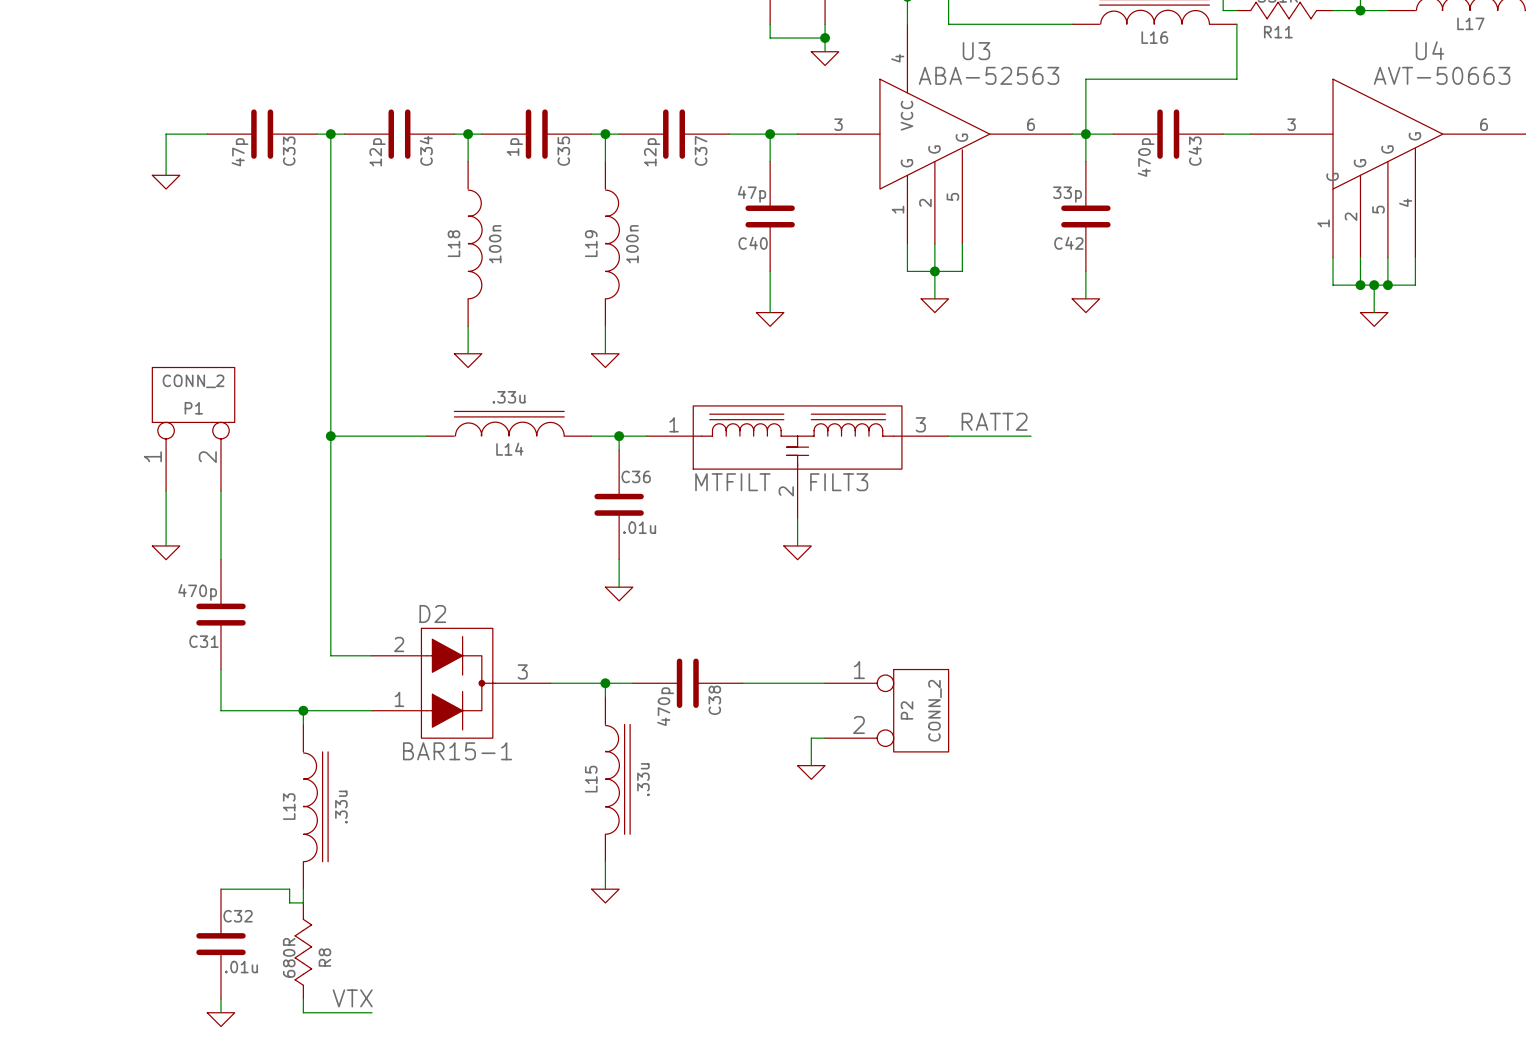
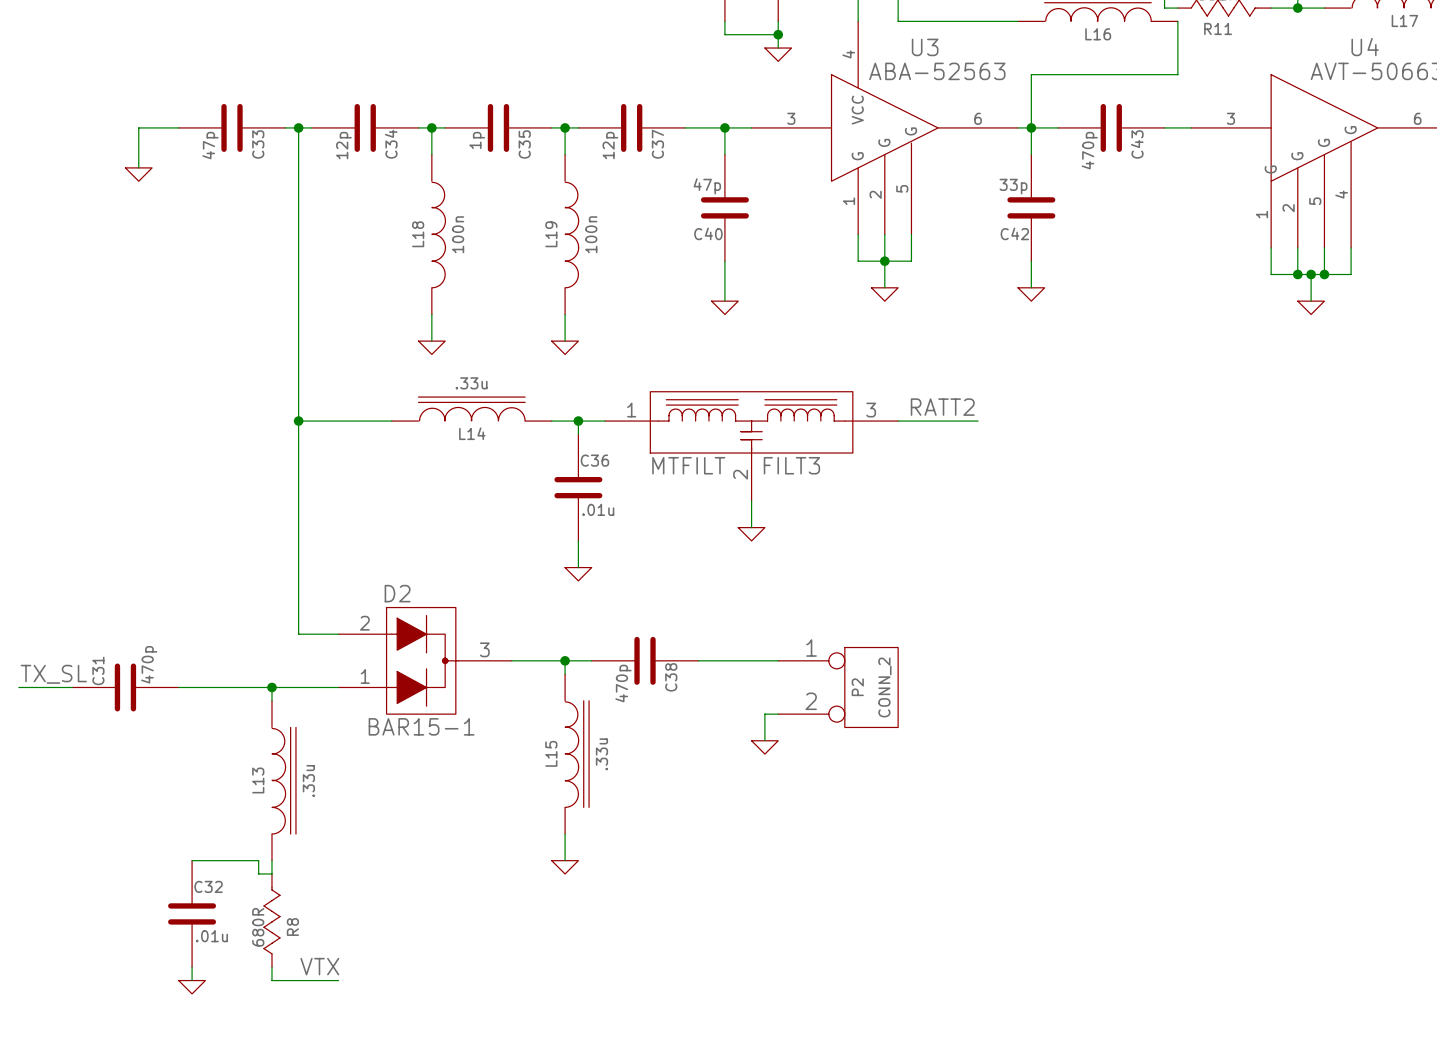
P1: CONN_2 (193, 429) -> none
wire: (166, 491) (166, 545) -> none
wire: (220, 491) (220, 559) -> none
power symbol: (166, 552) -> none
C31 rotation: 0° (220, 614) -> 90° clockwise (125, 687)
C31 position: (220, 614) -> (125, 687)
wire: (220, 669) (220, 710) -> (178, 687) (192, 687)
label: none -> TX_SL (53, 674)
wire: none -> (18, 687) (72, 687)

